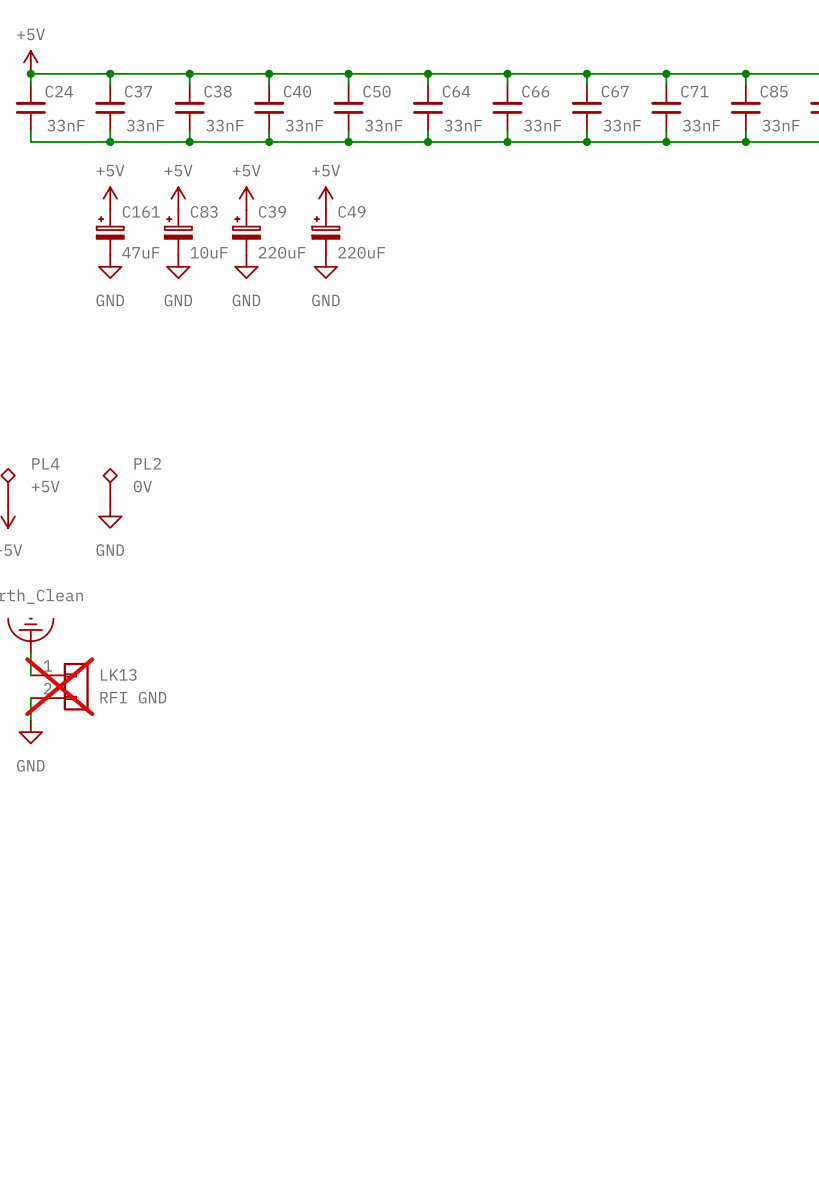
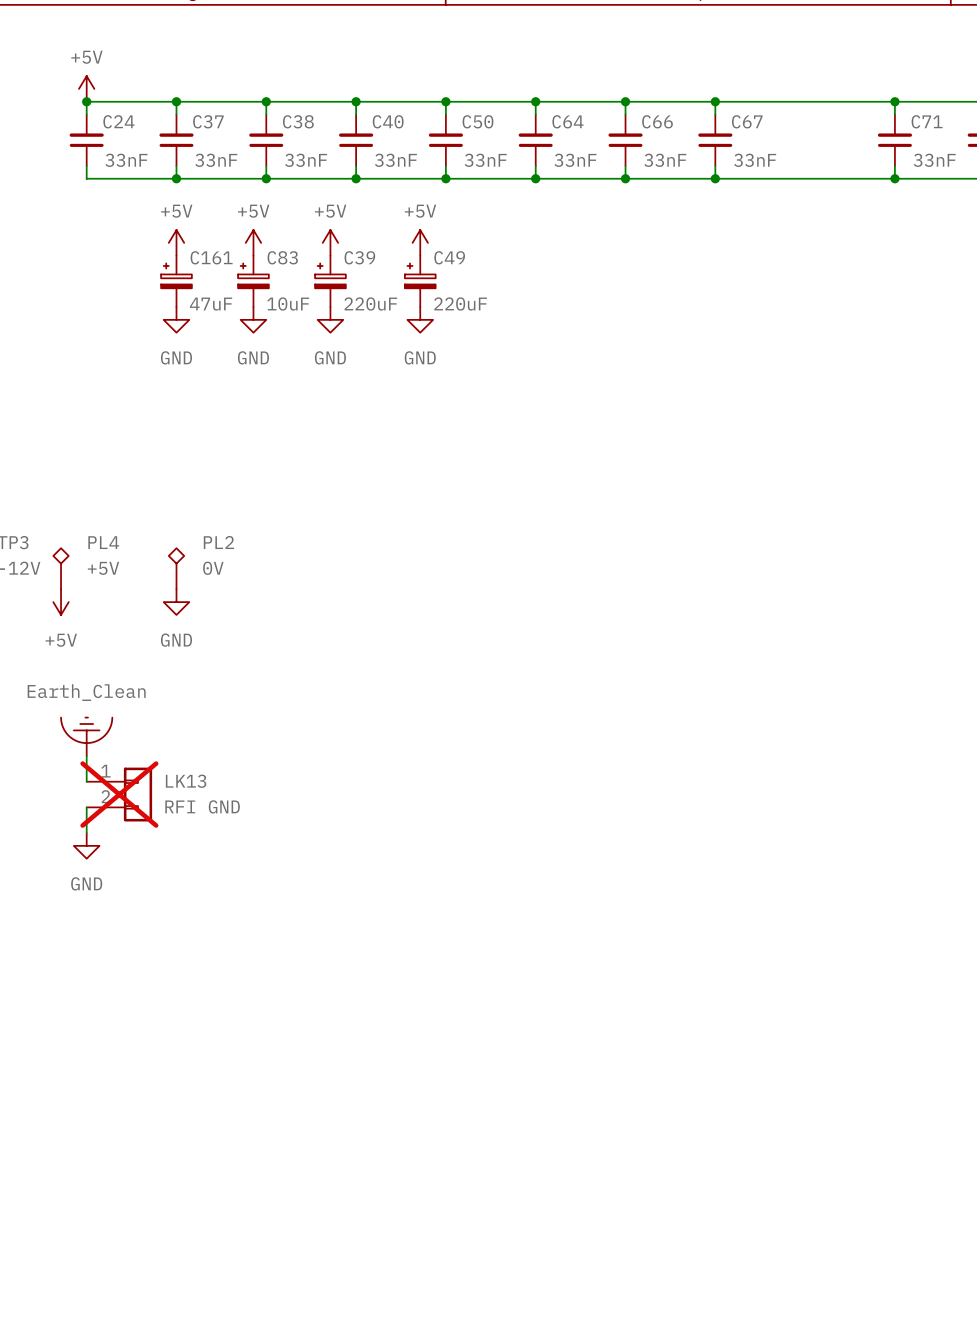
wire: (666, 73) (666, 85) -> none
junction: (666, 73) -> none
C85 name: C85 (774, 91) -> C71 (927, 121)
C71: 33nF (666, 107) -> none
wire: (666, 130) (666, 141) -> none
junction: (666, 141) -> none

